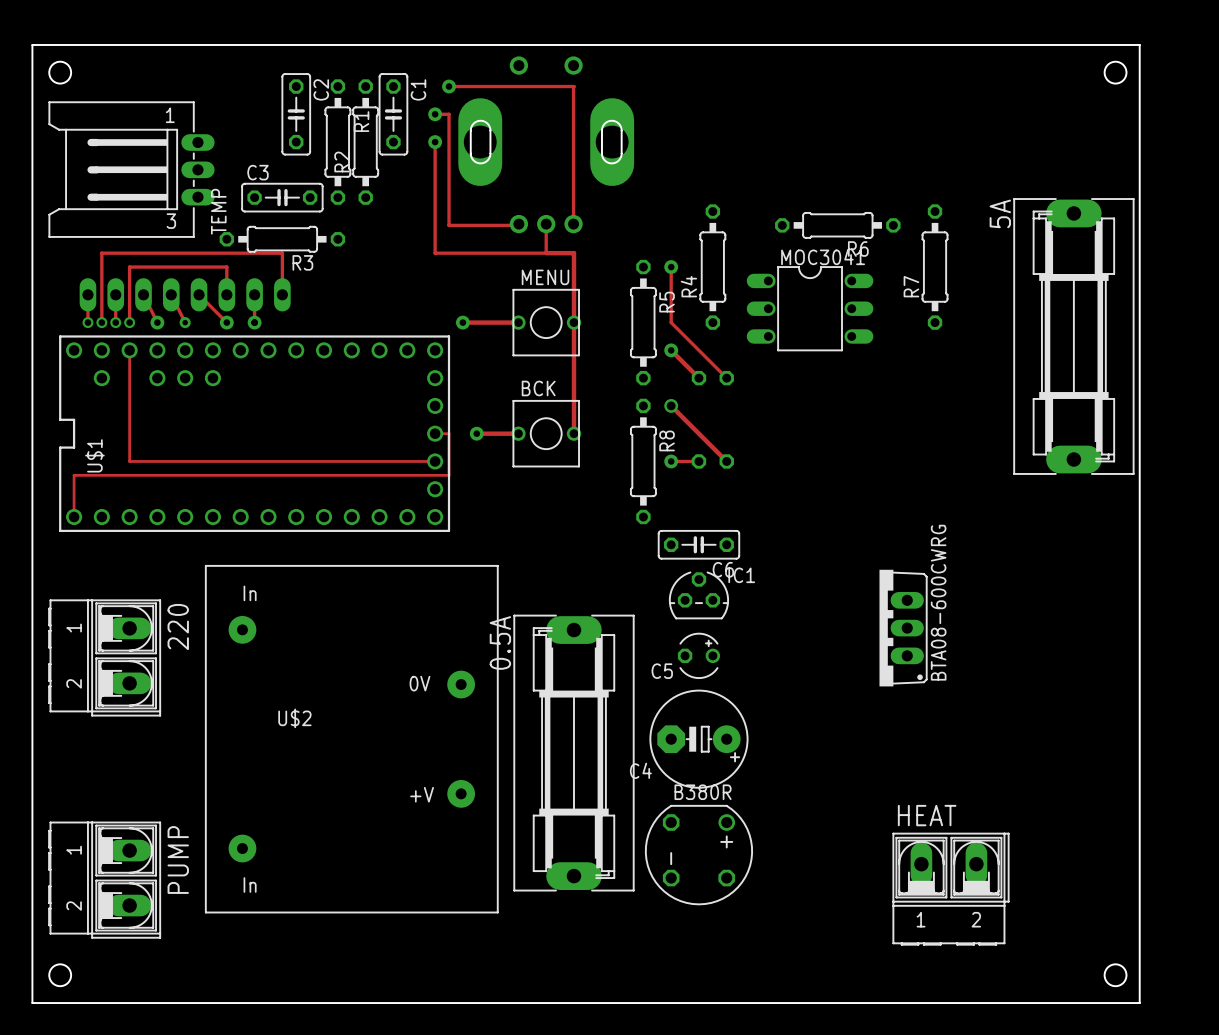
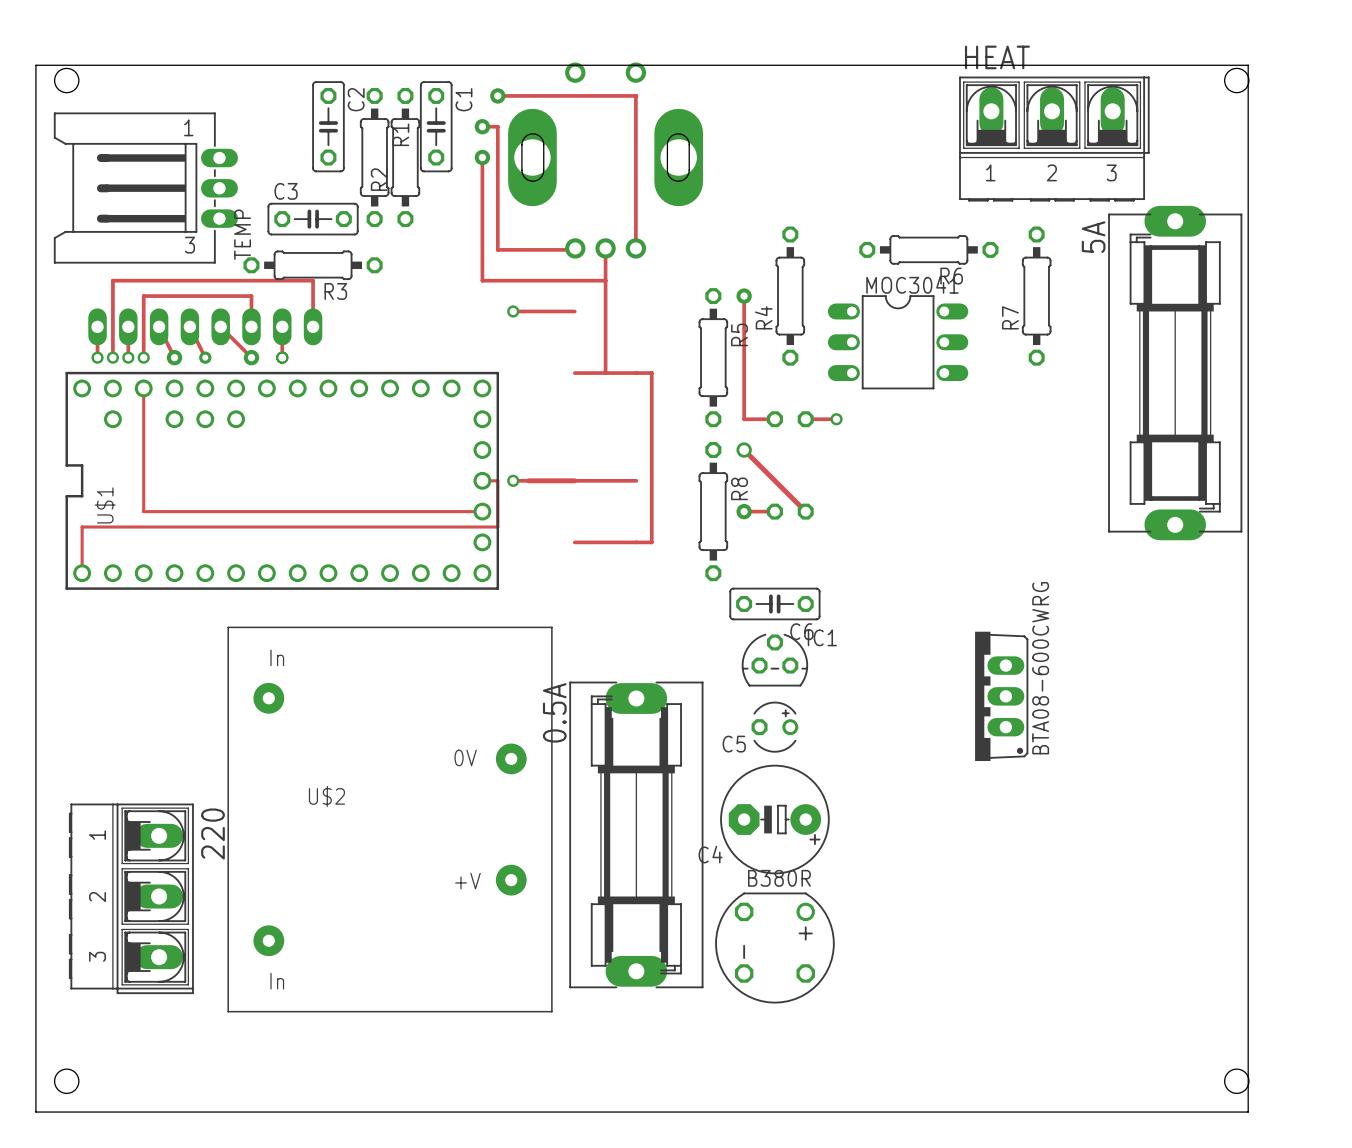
board edge: (32, 58) (32, 44) (1139, 44) (1139, 1003) (1125, 1003) -> (35, 65) (1248, 65) (1248, 1112)
HEAT: none -> (1054, 139)
5A footprint: [1013, 198, 1135, 475] -> [1108, 205, 1243, 541]
track: (546, 253) (573, 253) (573, 433) -> (605, 280) (605, 373)
via: none -> (513, 311)
via: (254, 322) -> none
track: (462, 322) (518, 322) -> (513, 311) (574, 311)
via: (462, 322) -> none
MENU: (546, 322) -> none
track: (671, 322) (726, 378) -> (744, 357) (744, 419) (774, 419)
track: none -> (574, 373) (651, 373) (651, 542) (574, 542)
track: (671, 350) (698, 378) -> none
via: (671, 350) -> none
track: none -> (805, 419) (836, 419)
via: none -> (836, 419)
track: none -> (513, 480) (528, 480)
via: none -> (513, 480)
via: (476, 433) -> none
track: none -> (574, 480) (636, 480)
BCK: (546, 433) -> none
220 footprint: [48, 599, 162, 717] -> [68, 803, 194, 995]
220 name position: 220 (178, 627) -> 220 (212, 834)
PUMP: (104, 880) -> none
HEAT: (951, 889) -> none

